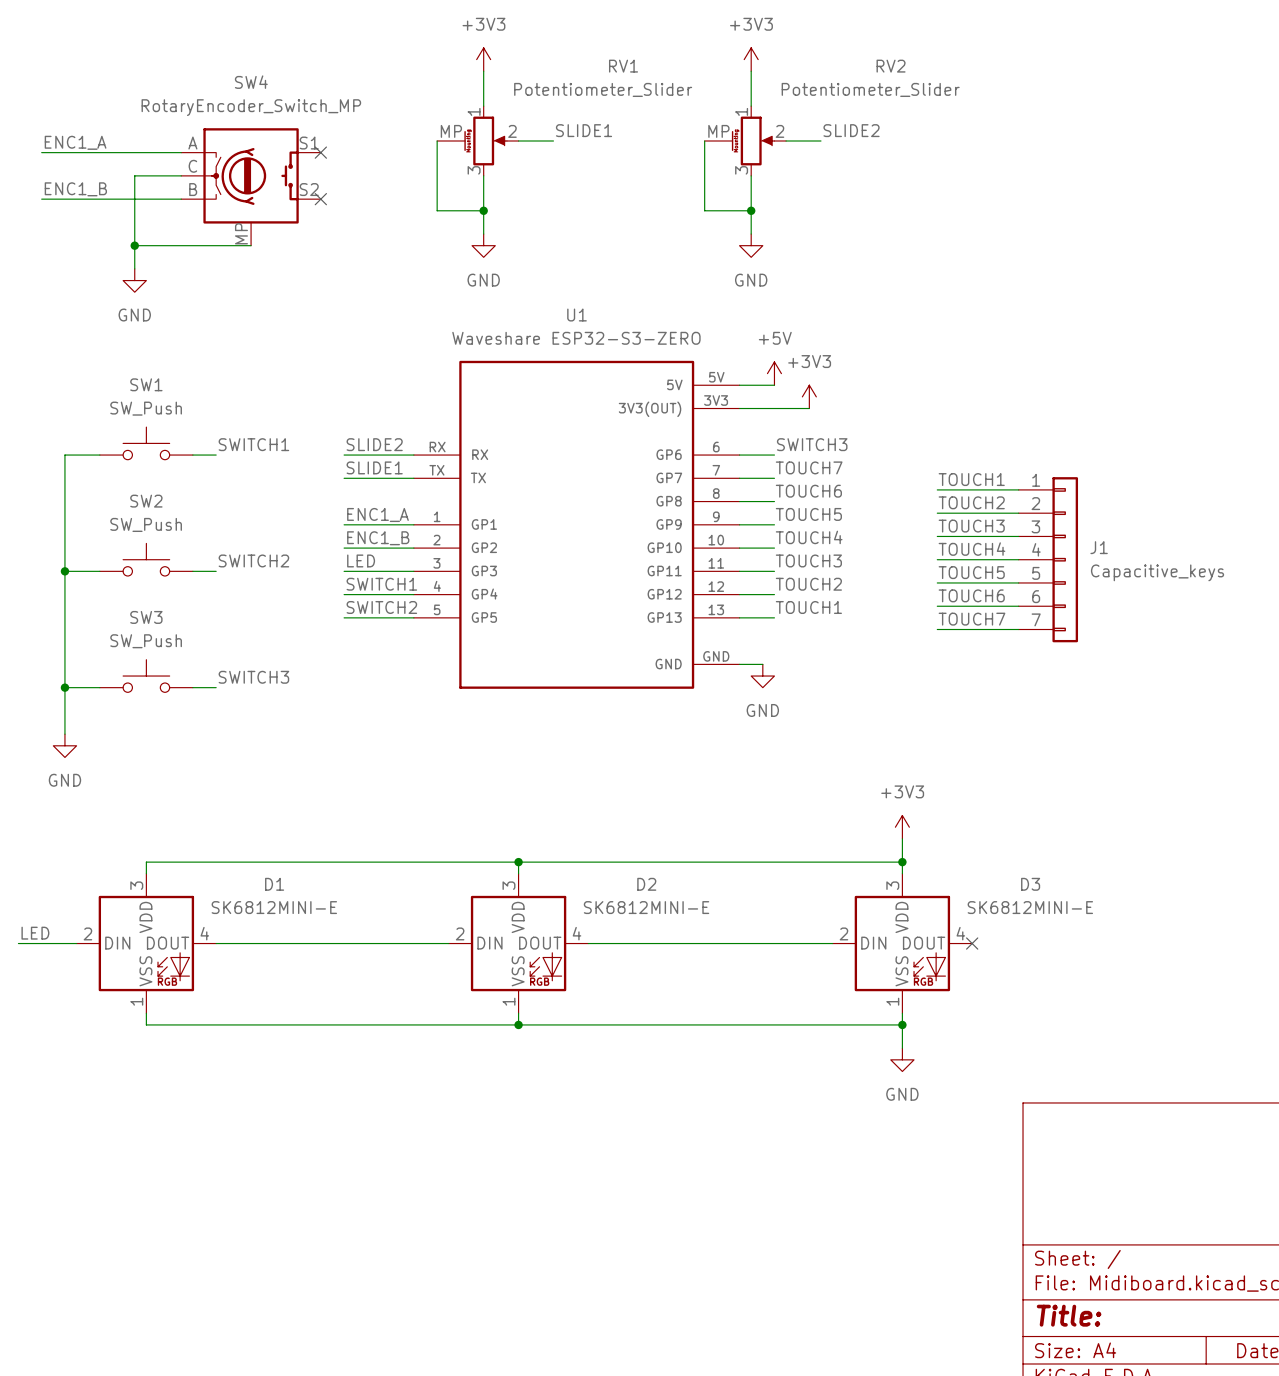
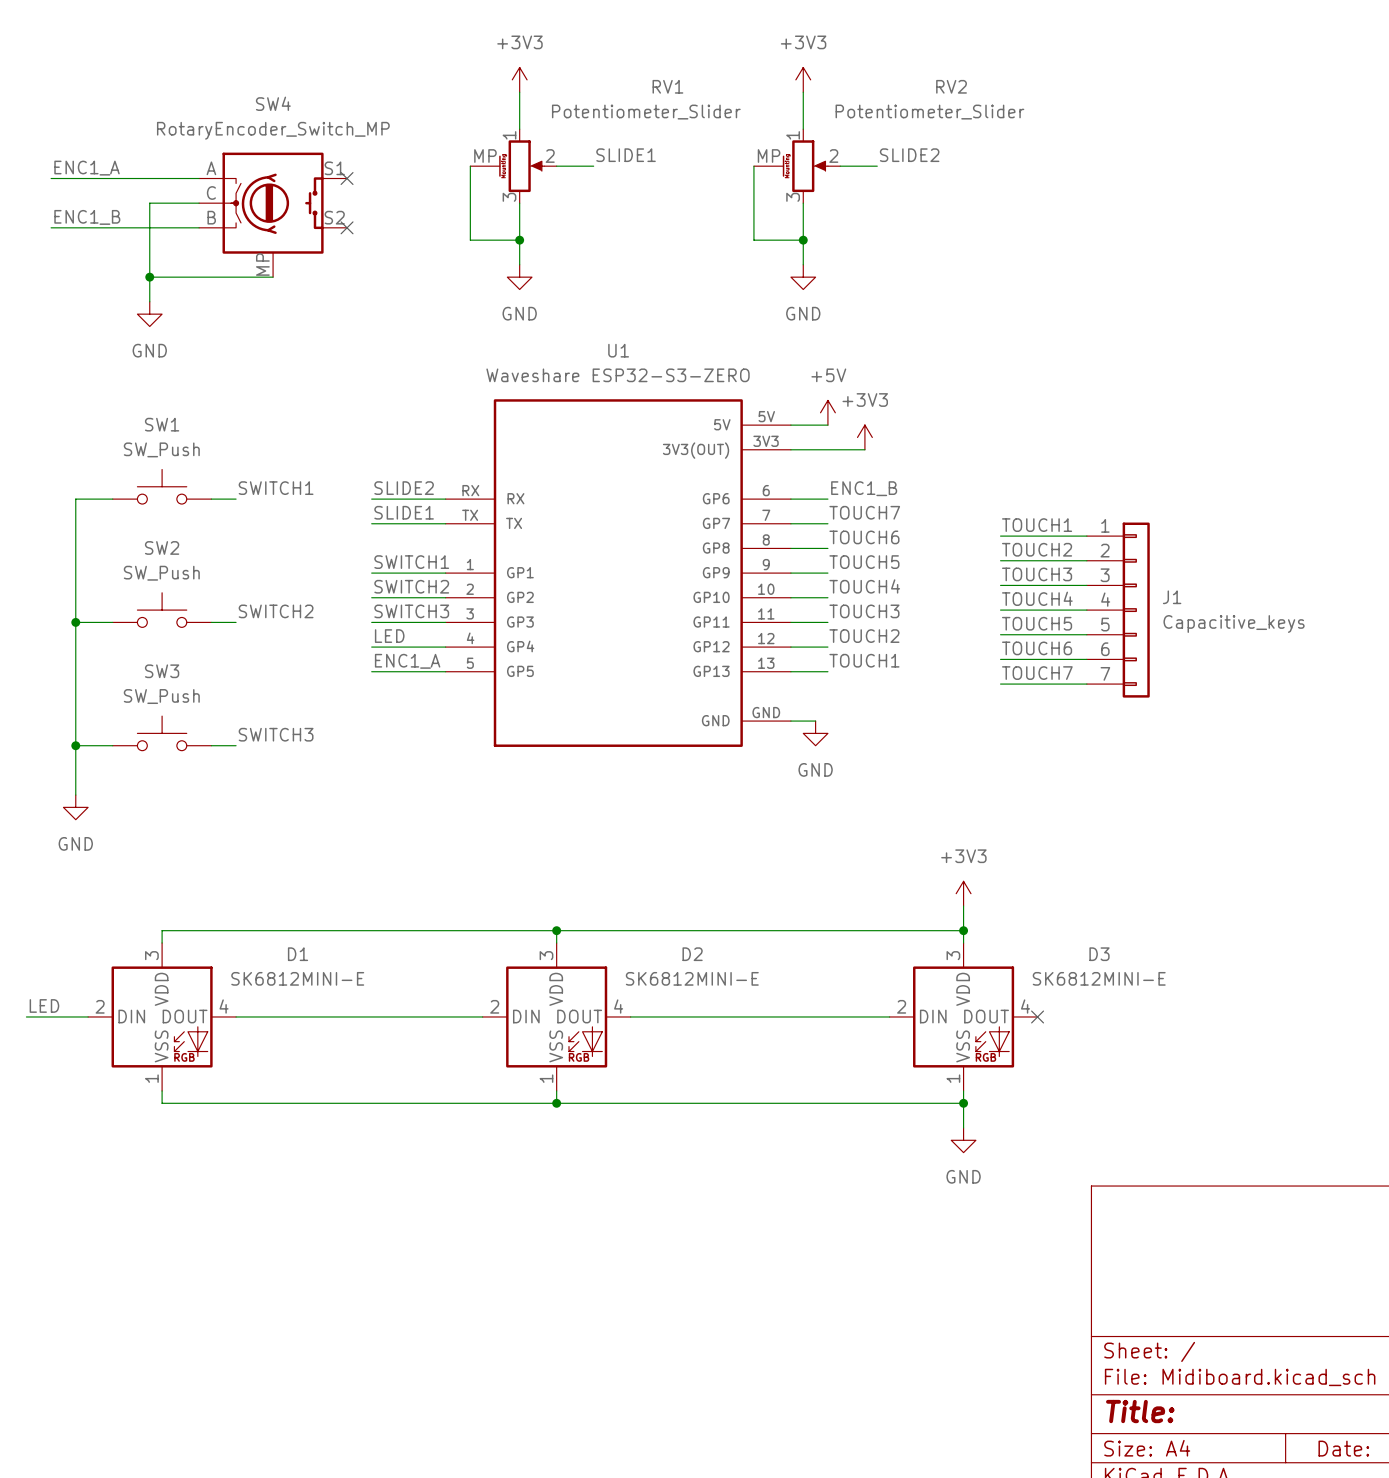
label: SWITCH3 (812, 444) -> ENC1_B (864, 488)
label: ENC1_A (377, 514) -> SWITCH1 (411, 562)
label: ENC1_B (378, 538) -> SWITCH2 (411, 586)
label: LED (361, 560) -> SWITCH3 (411, 611)
label: SWITCH1 (381, 584) -> LED (389, 636)
label: SWITCH2 (381, 607) -> ENC1_A (407, 661)

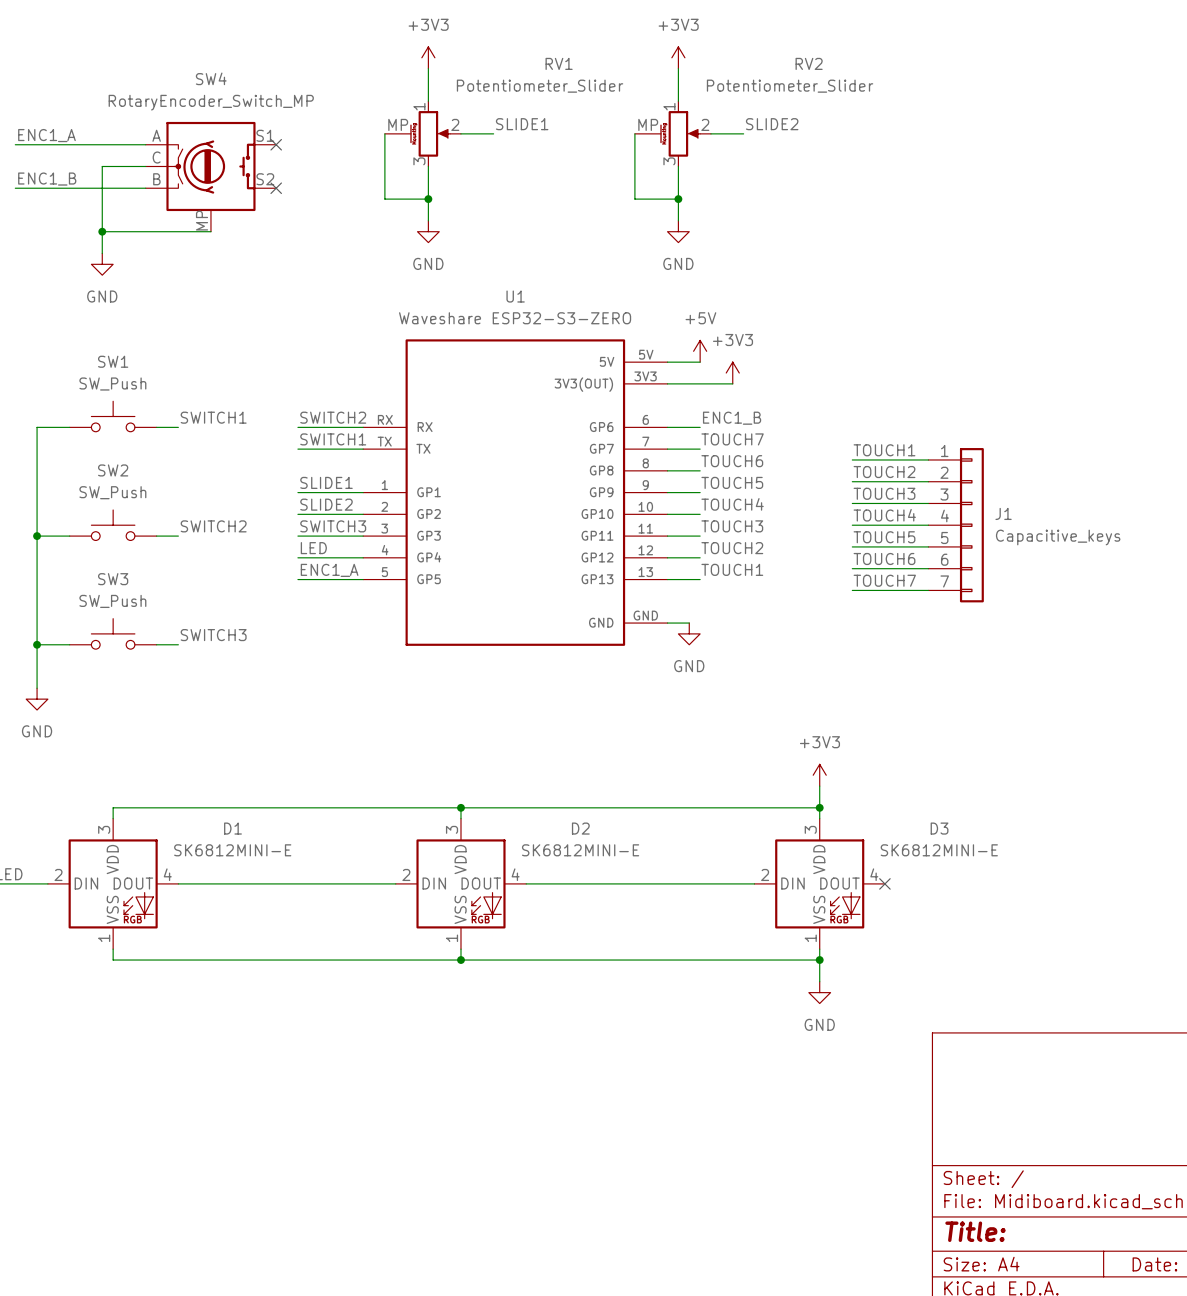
label: SLIDE2 (404, 488) -> SWITCH2 (333, 417)
label: SLIDE1 (404, 512) -> SWITCH1 (333, 439)
label: SWITCH1 (411, 562) -> SLIDE1 (326, 482)
label: SWITCH2 (411, 586) -> SLIDE2 (326, 504)

